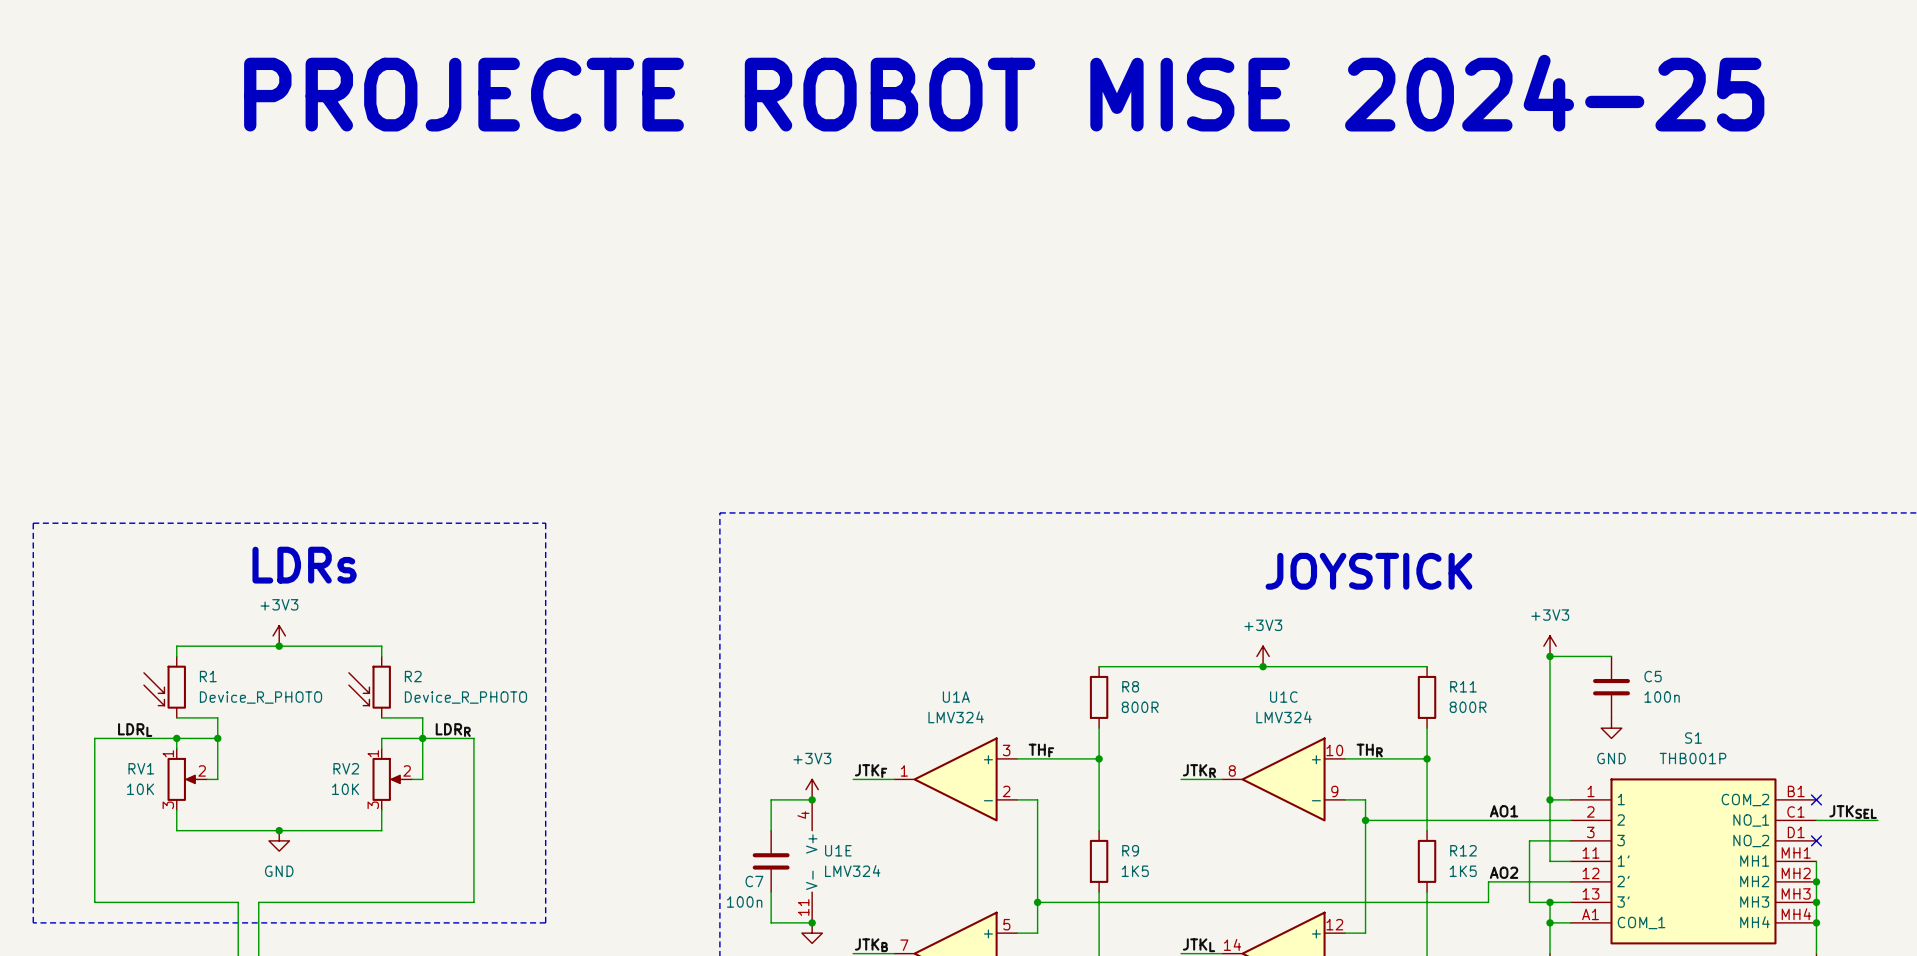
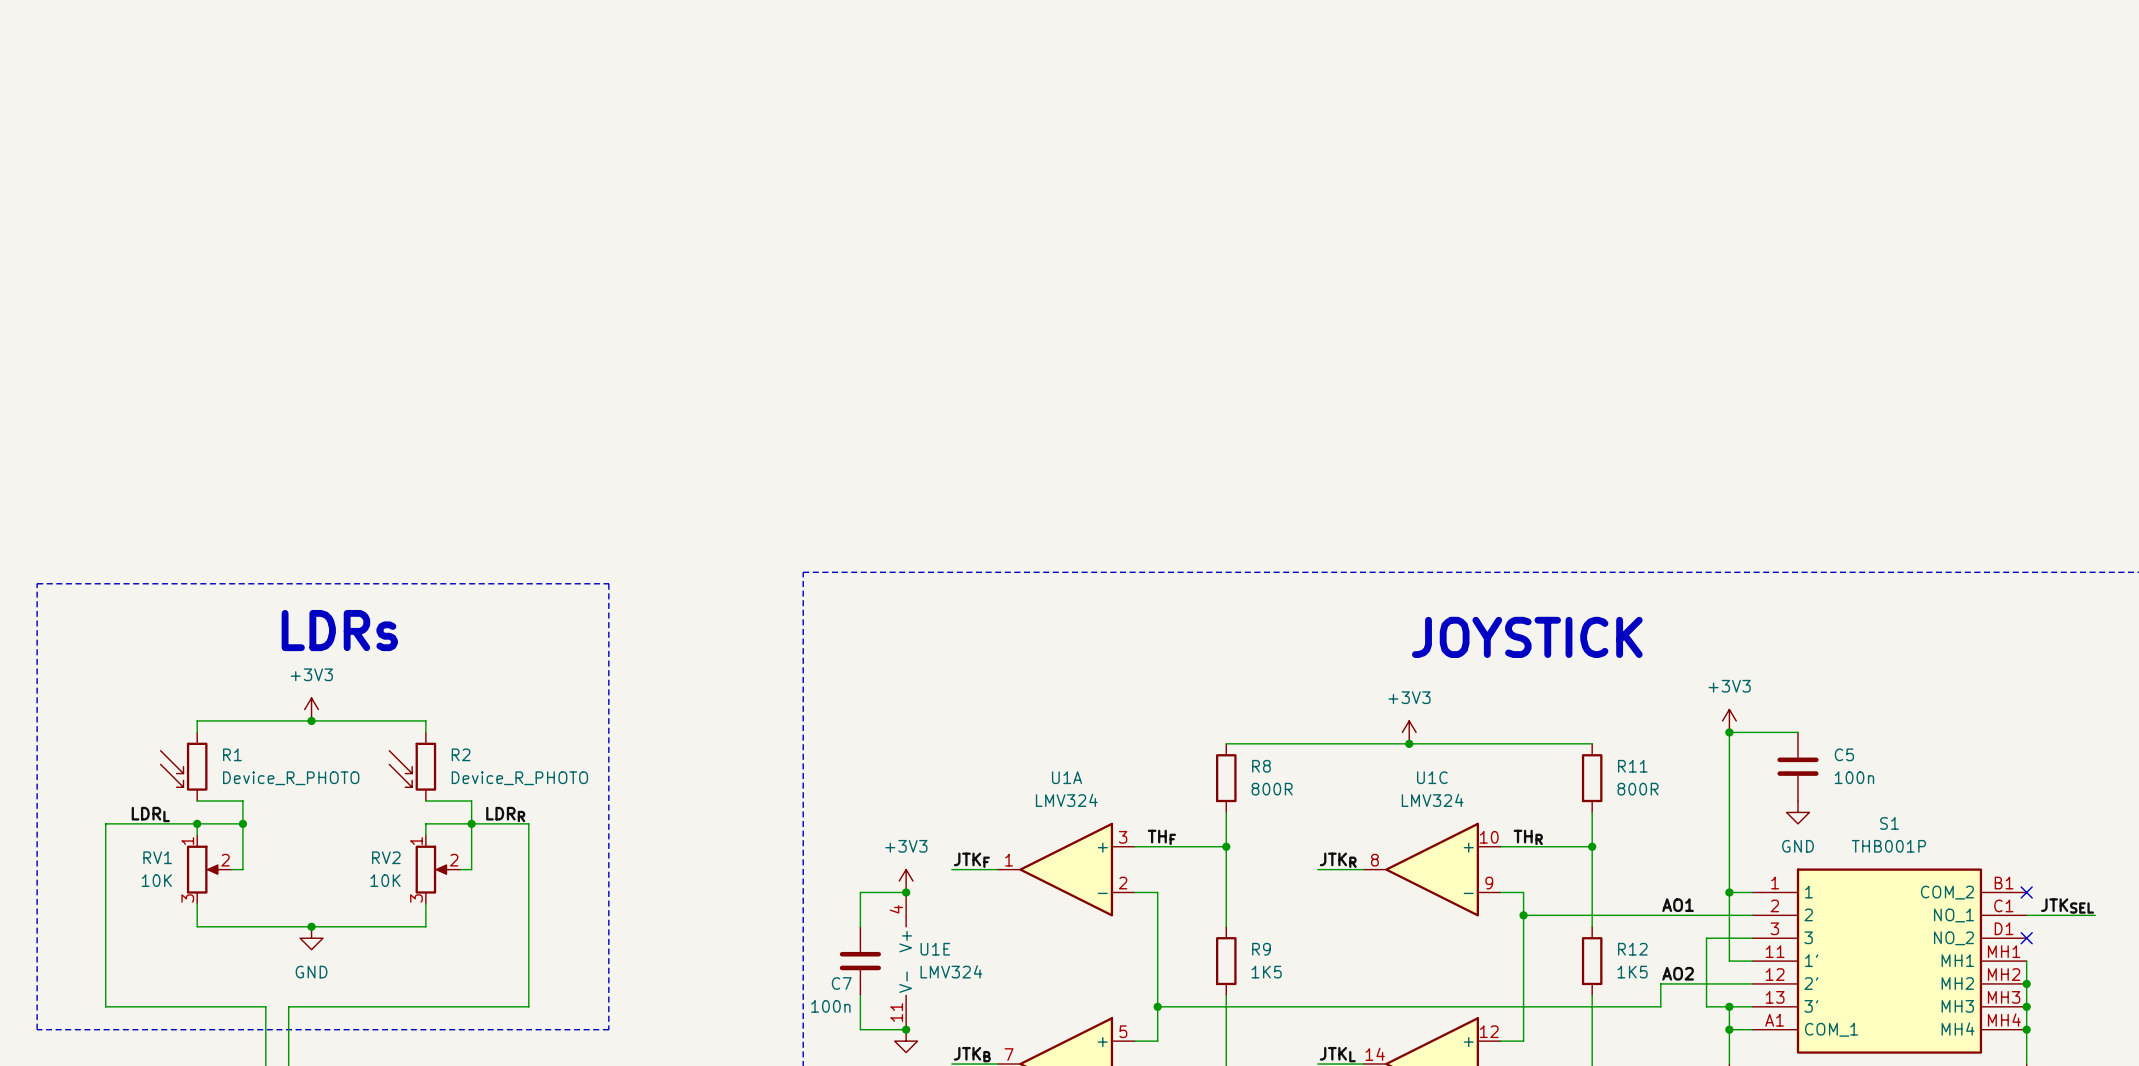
text: PROJECTE ROBOT MISE 2024-25 (1004, 93) -> none

